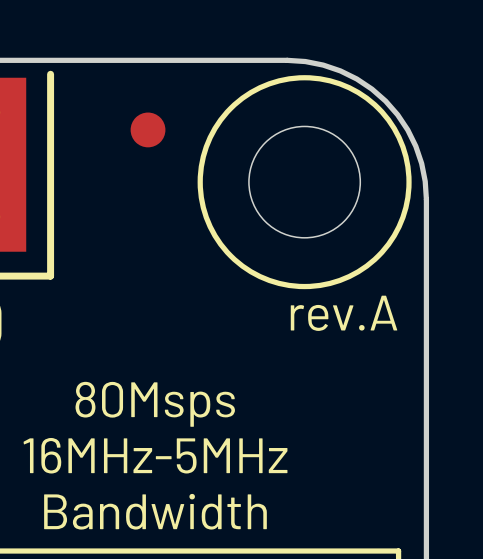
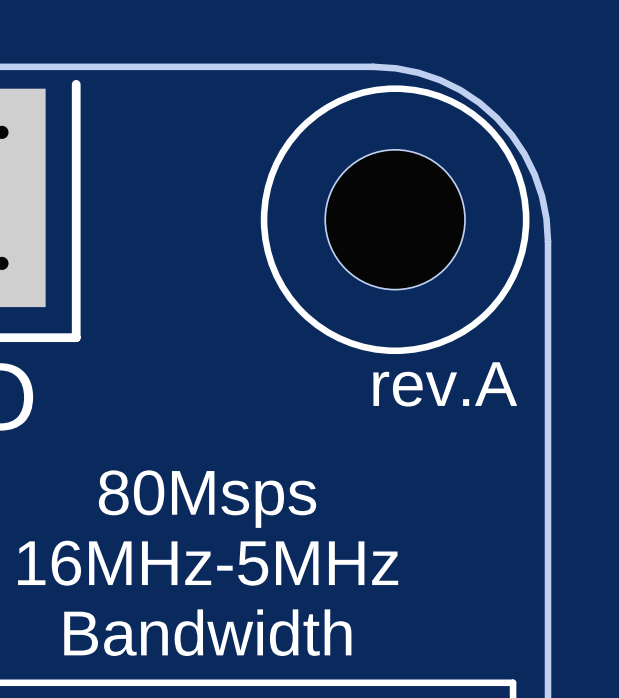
part: (148, 129) -> none

